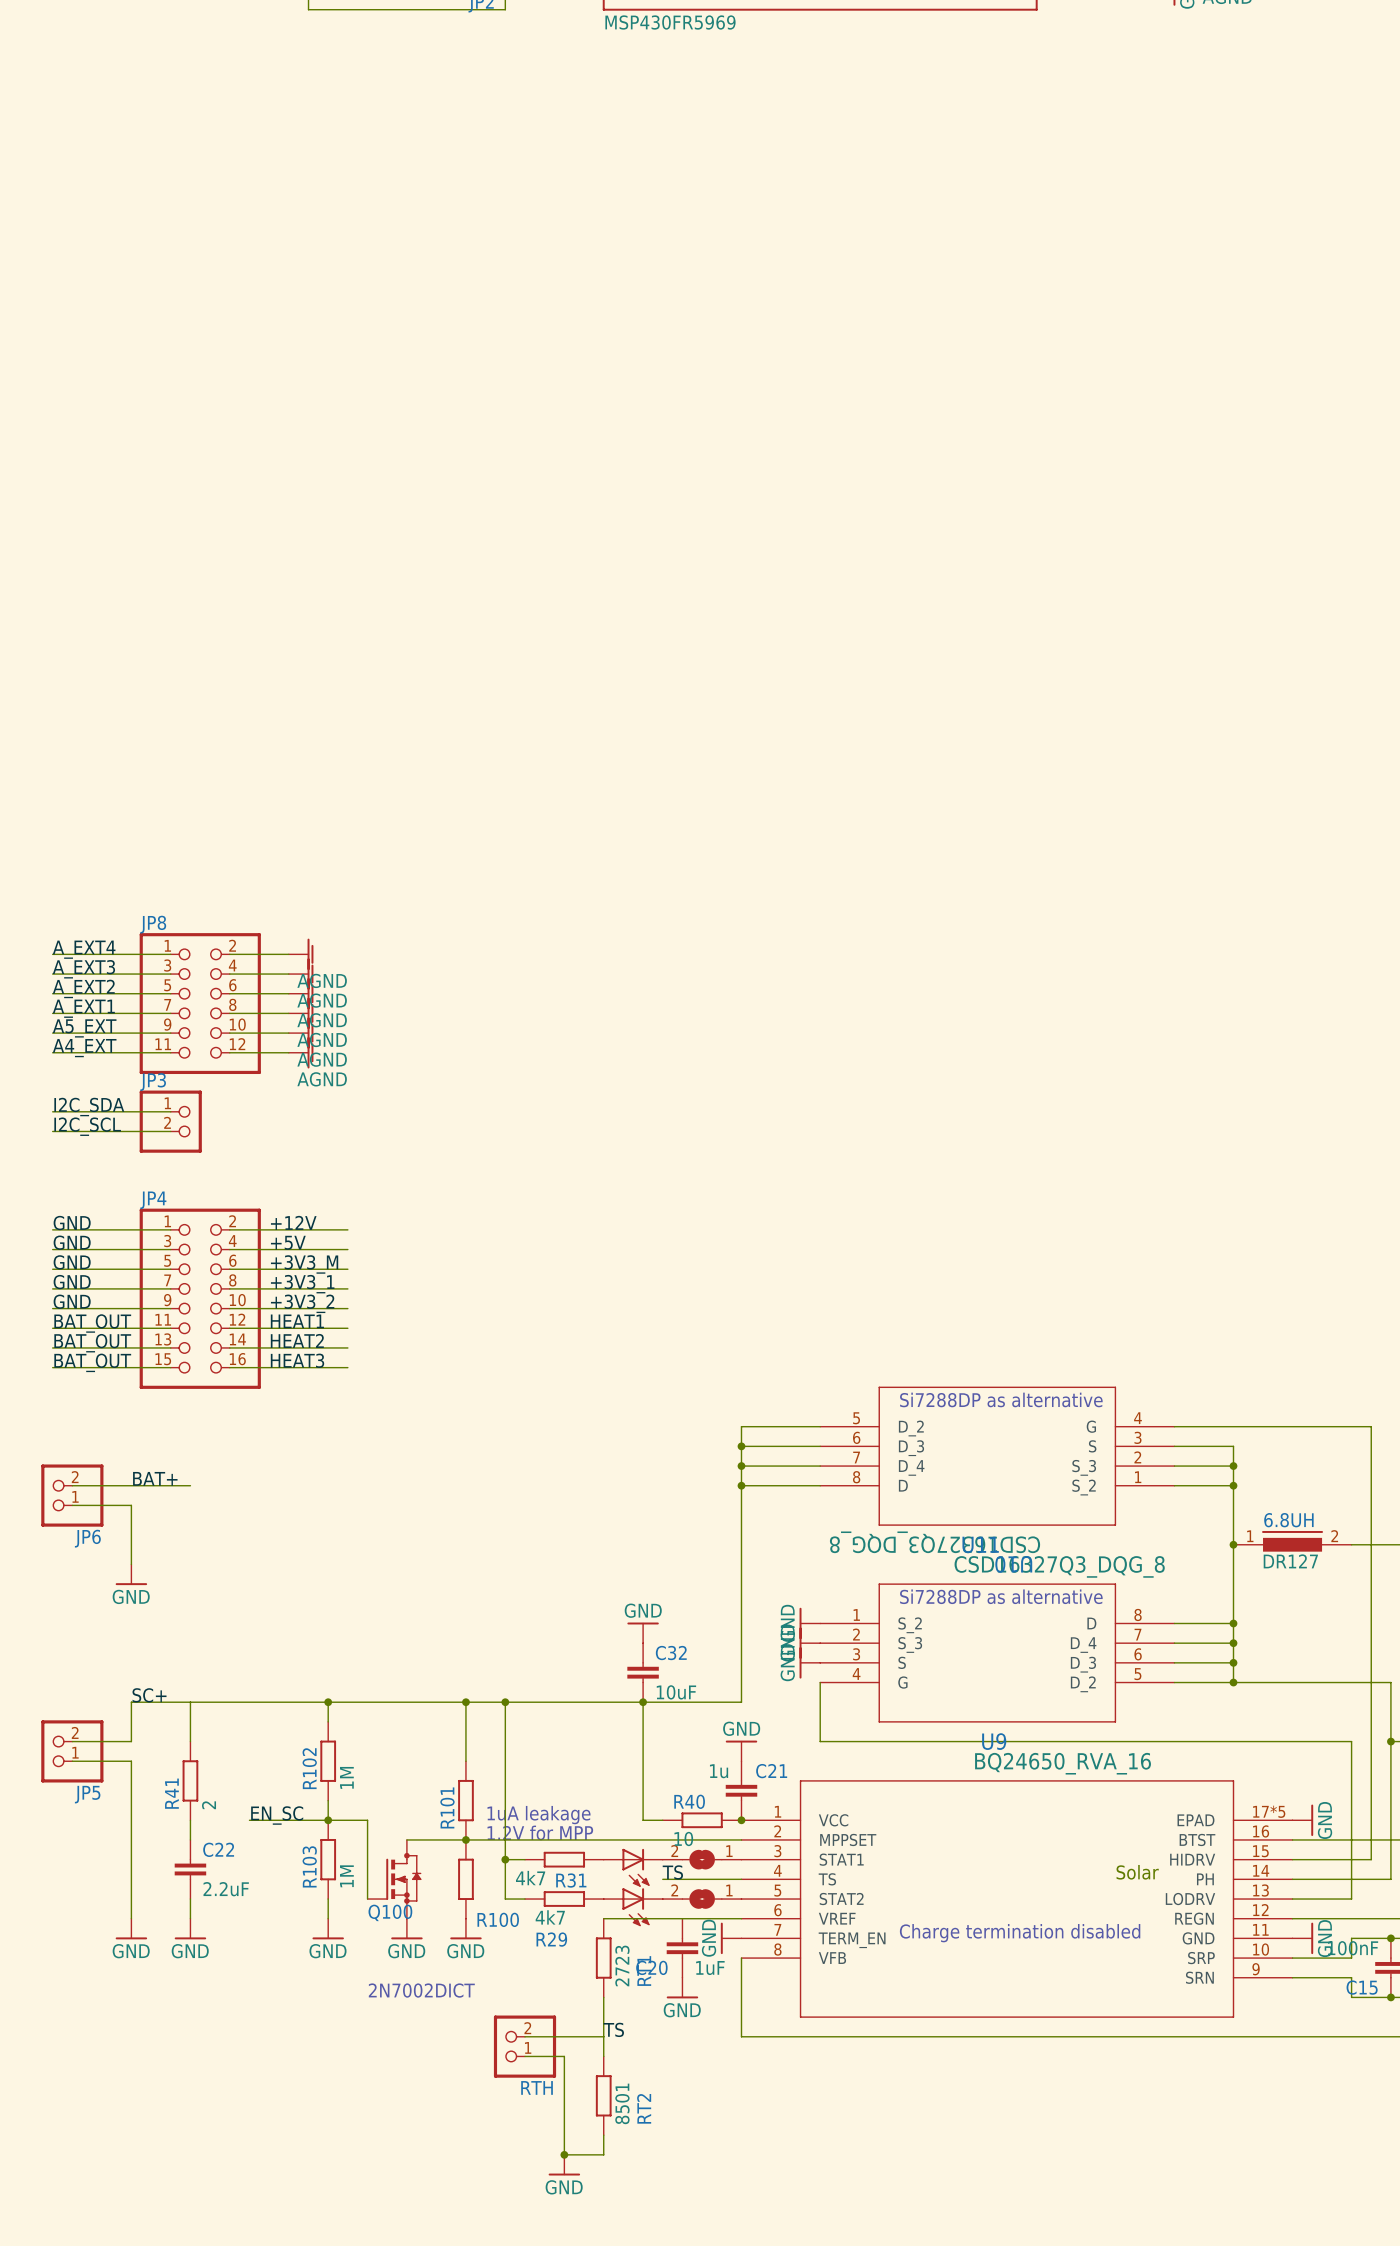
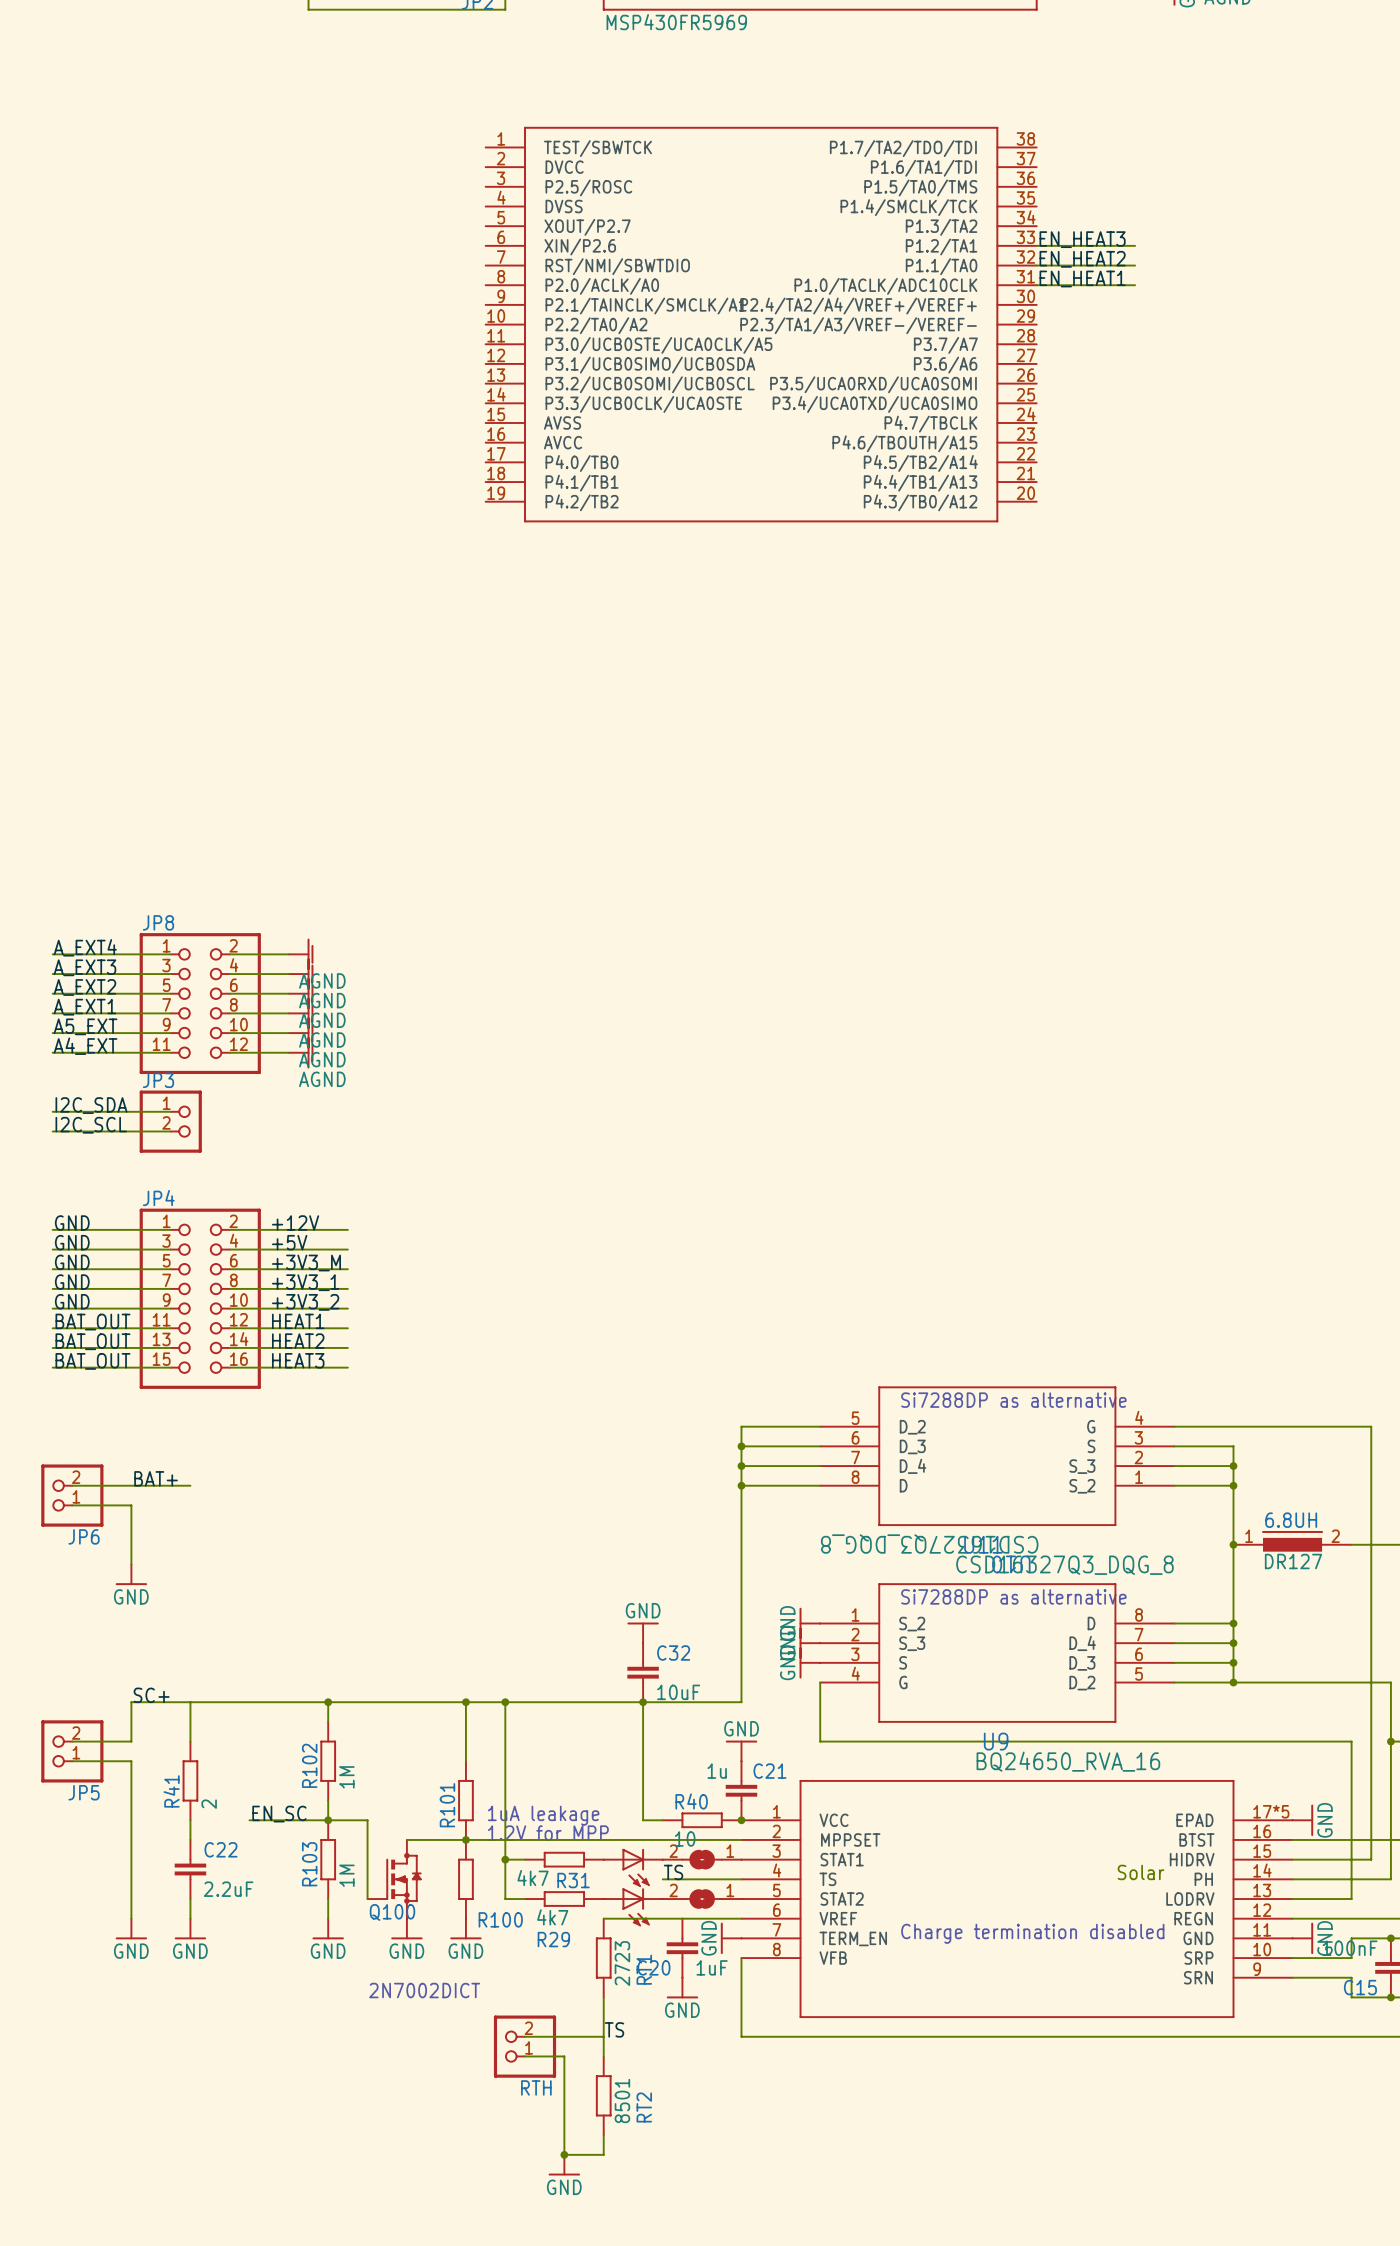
label: none -> EN_HEAT3 (1082, 239)
wire: none -> (1036, 245) (1135, 245)
label: none -> EN_HEAT2 (1082, 259)
wire: none -> (1036, 265) (1135, 265)
label: none -> EN_HEAT1 (1082, 278)
wire: none -> (1036, 285) (1135, 285)
part: none -> (761, 324)

